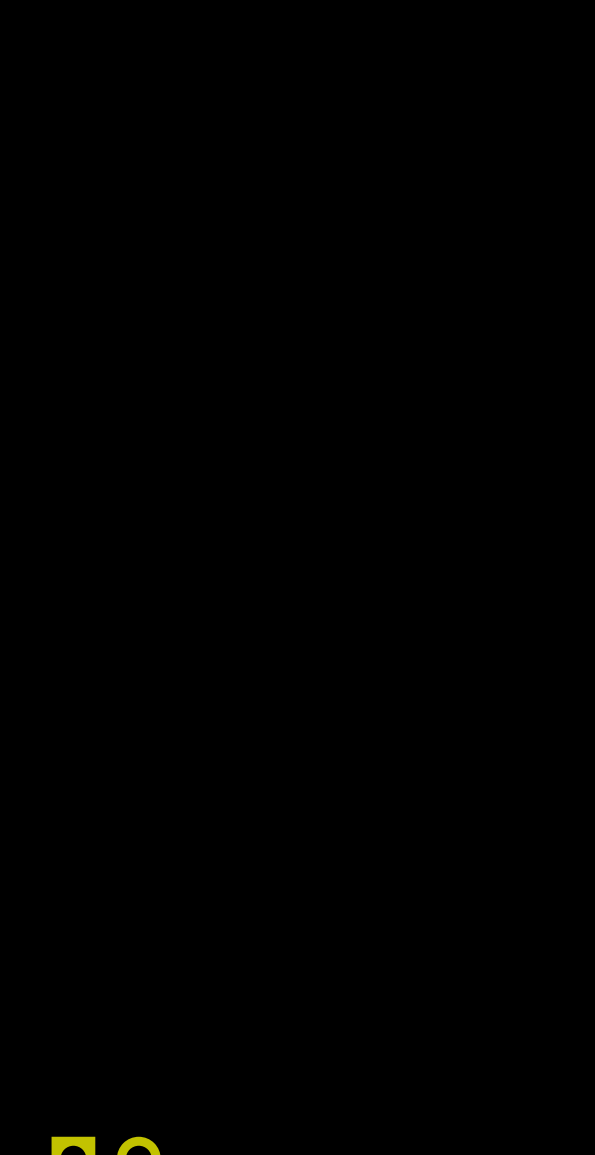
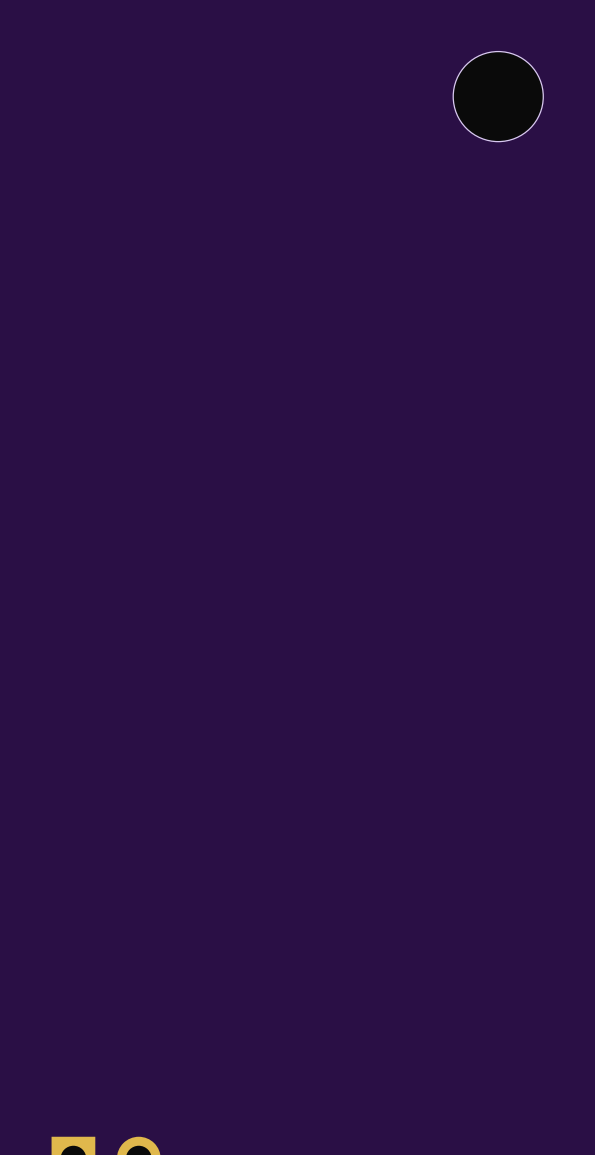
part: none -> (498, 96)

